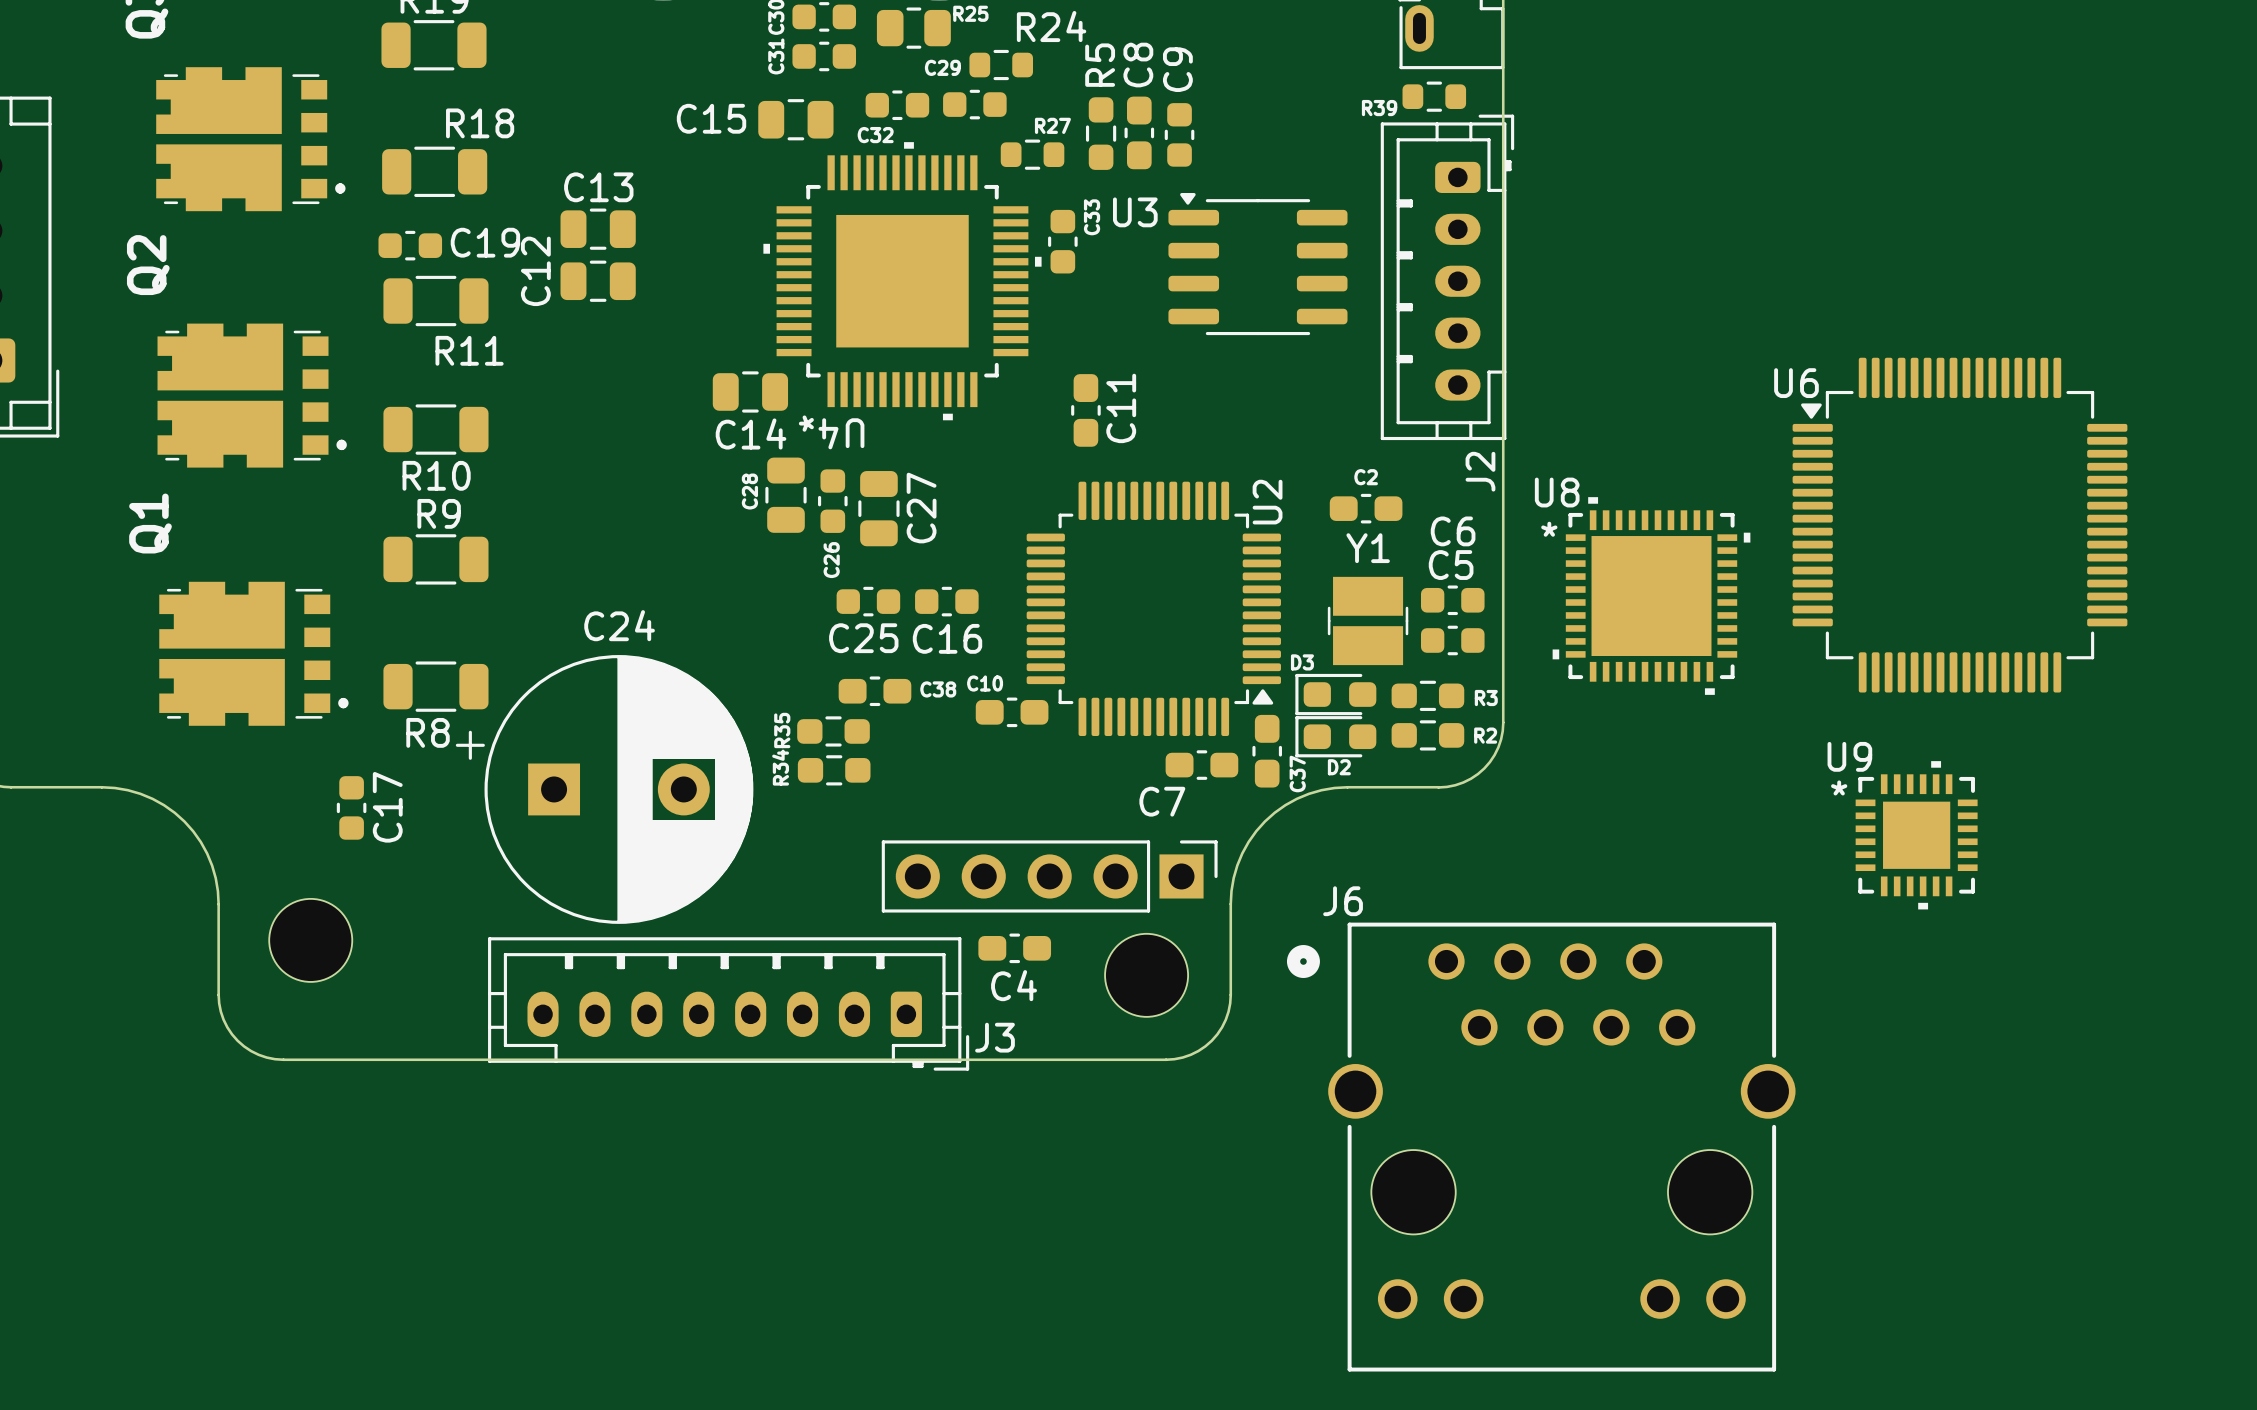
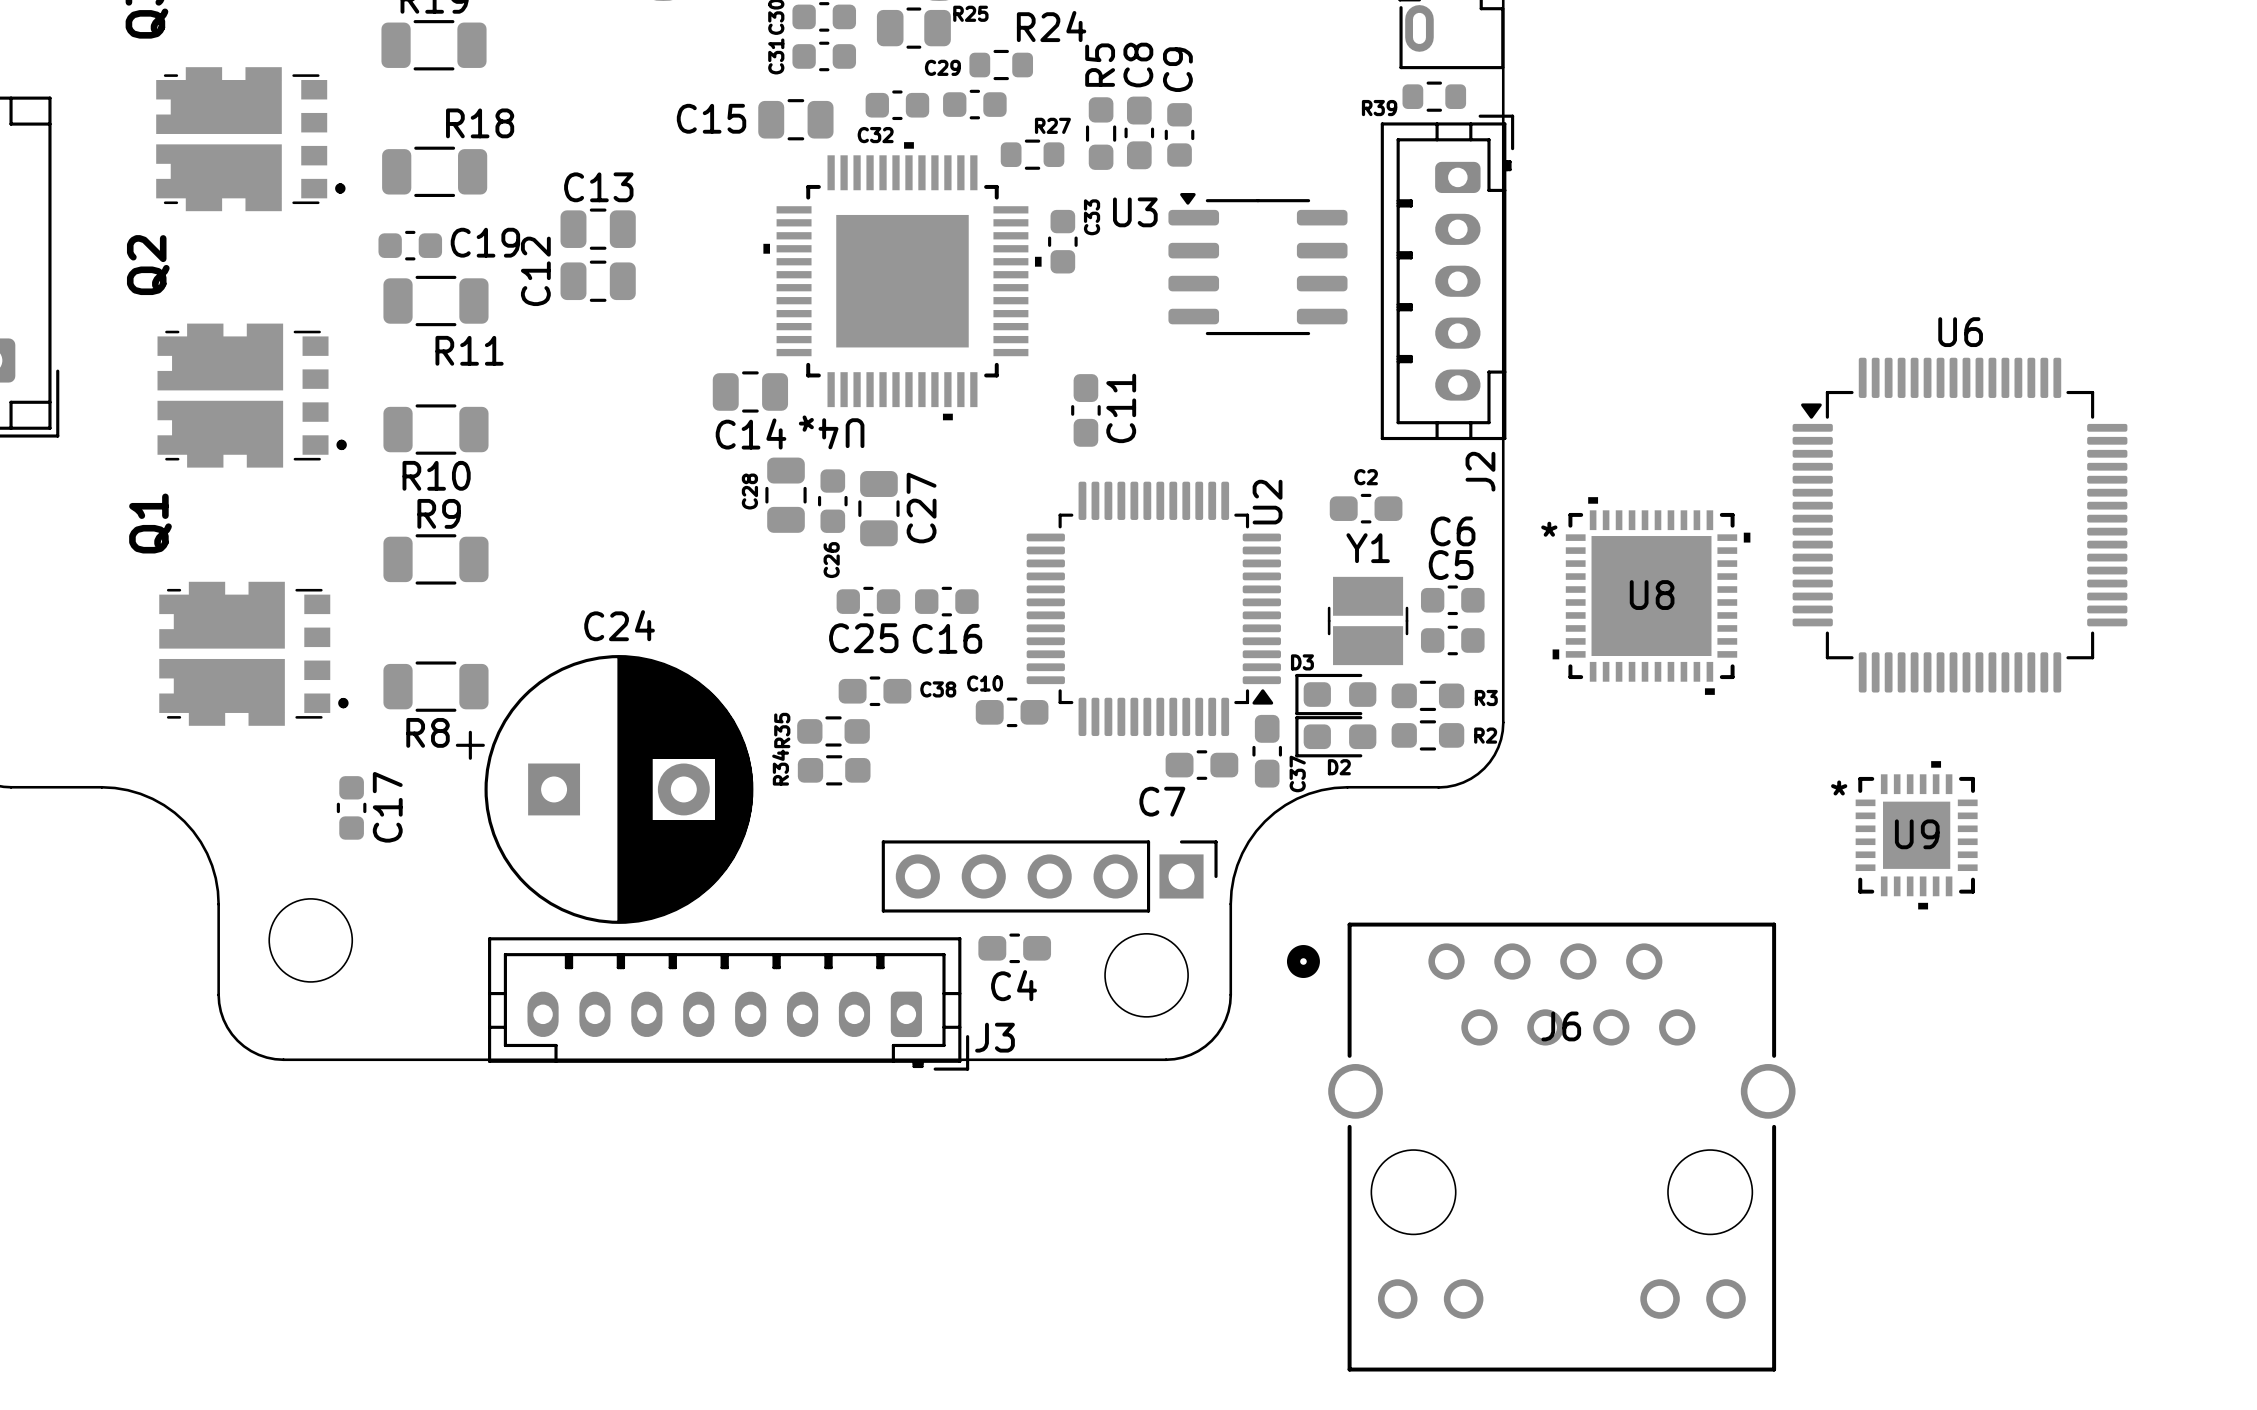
U6 name position: U6 (1796, 383) -> U6 (1960, 332)
U8 name position: U8 (1557, 492) -> U8 (1652, 595)
U9 name position: U9 (1849, 756) -> U9 (1917, 834)
J6 name position: J6 (1343, 901) -> J6 (1561, 1026)

